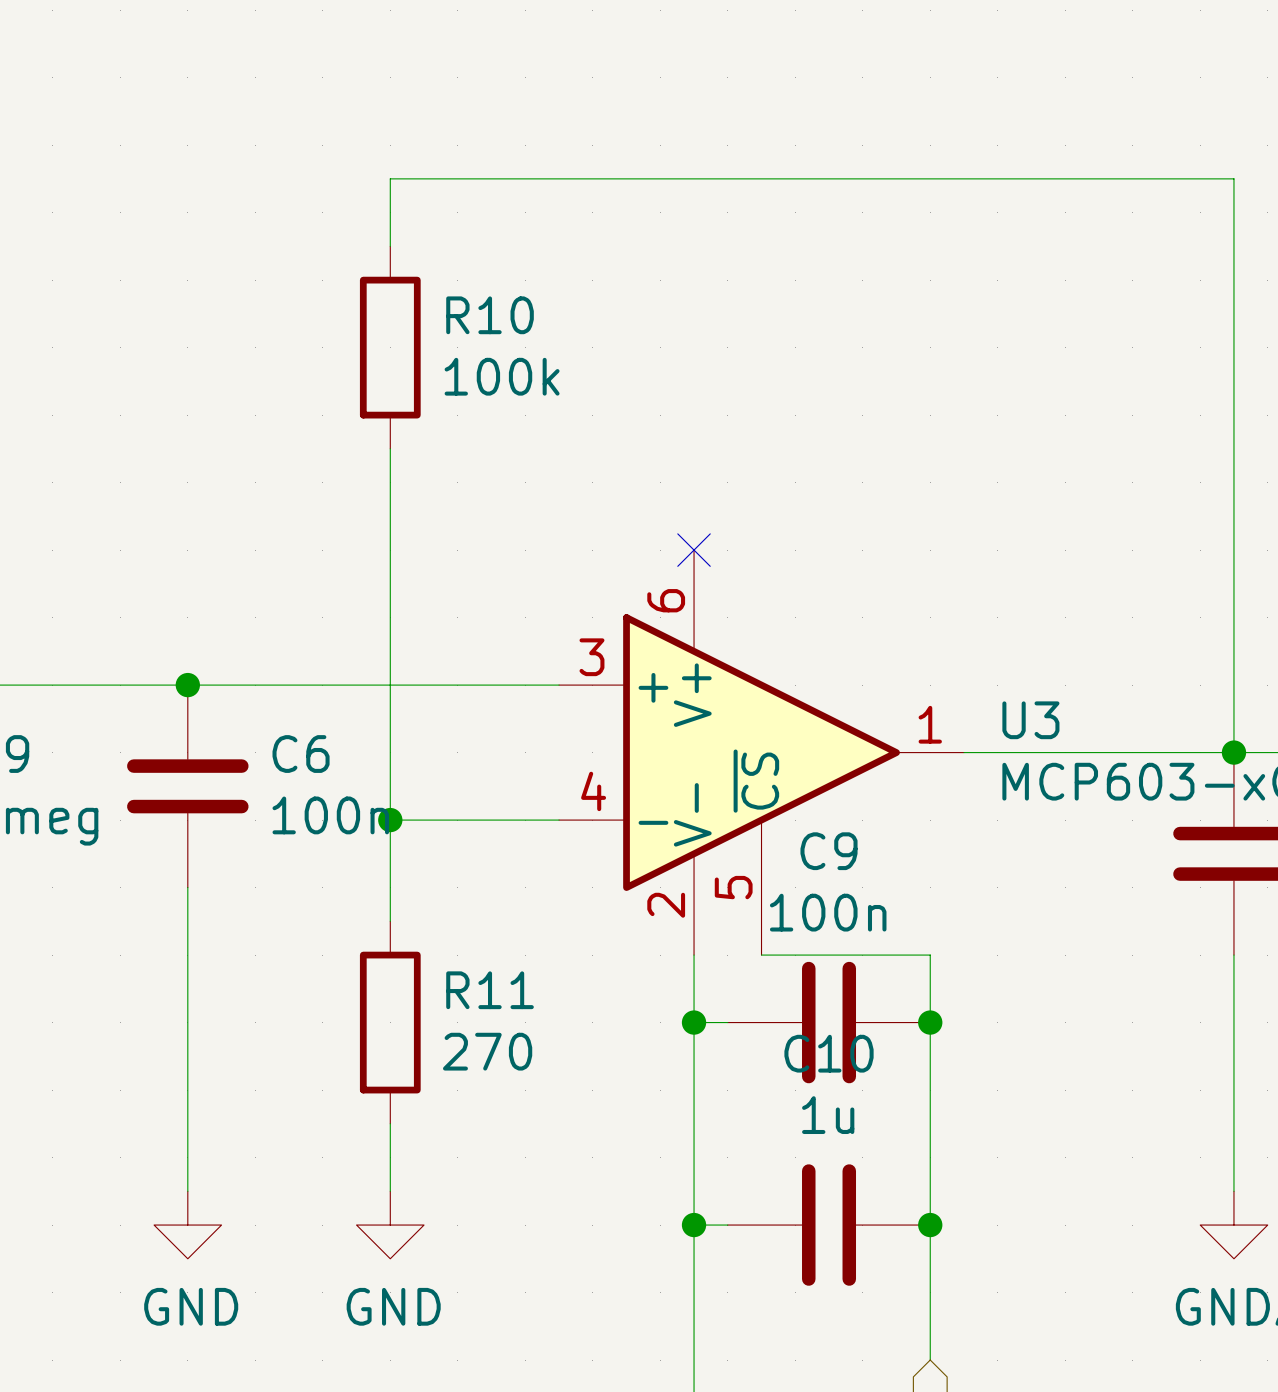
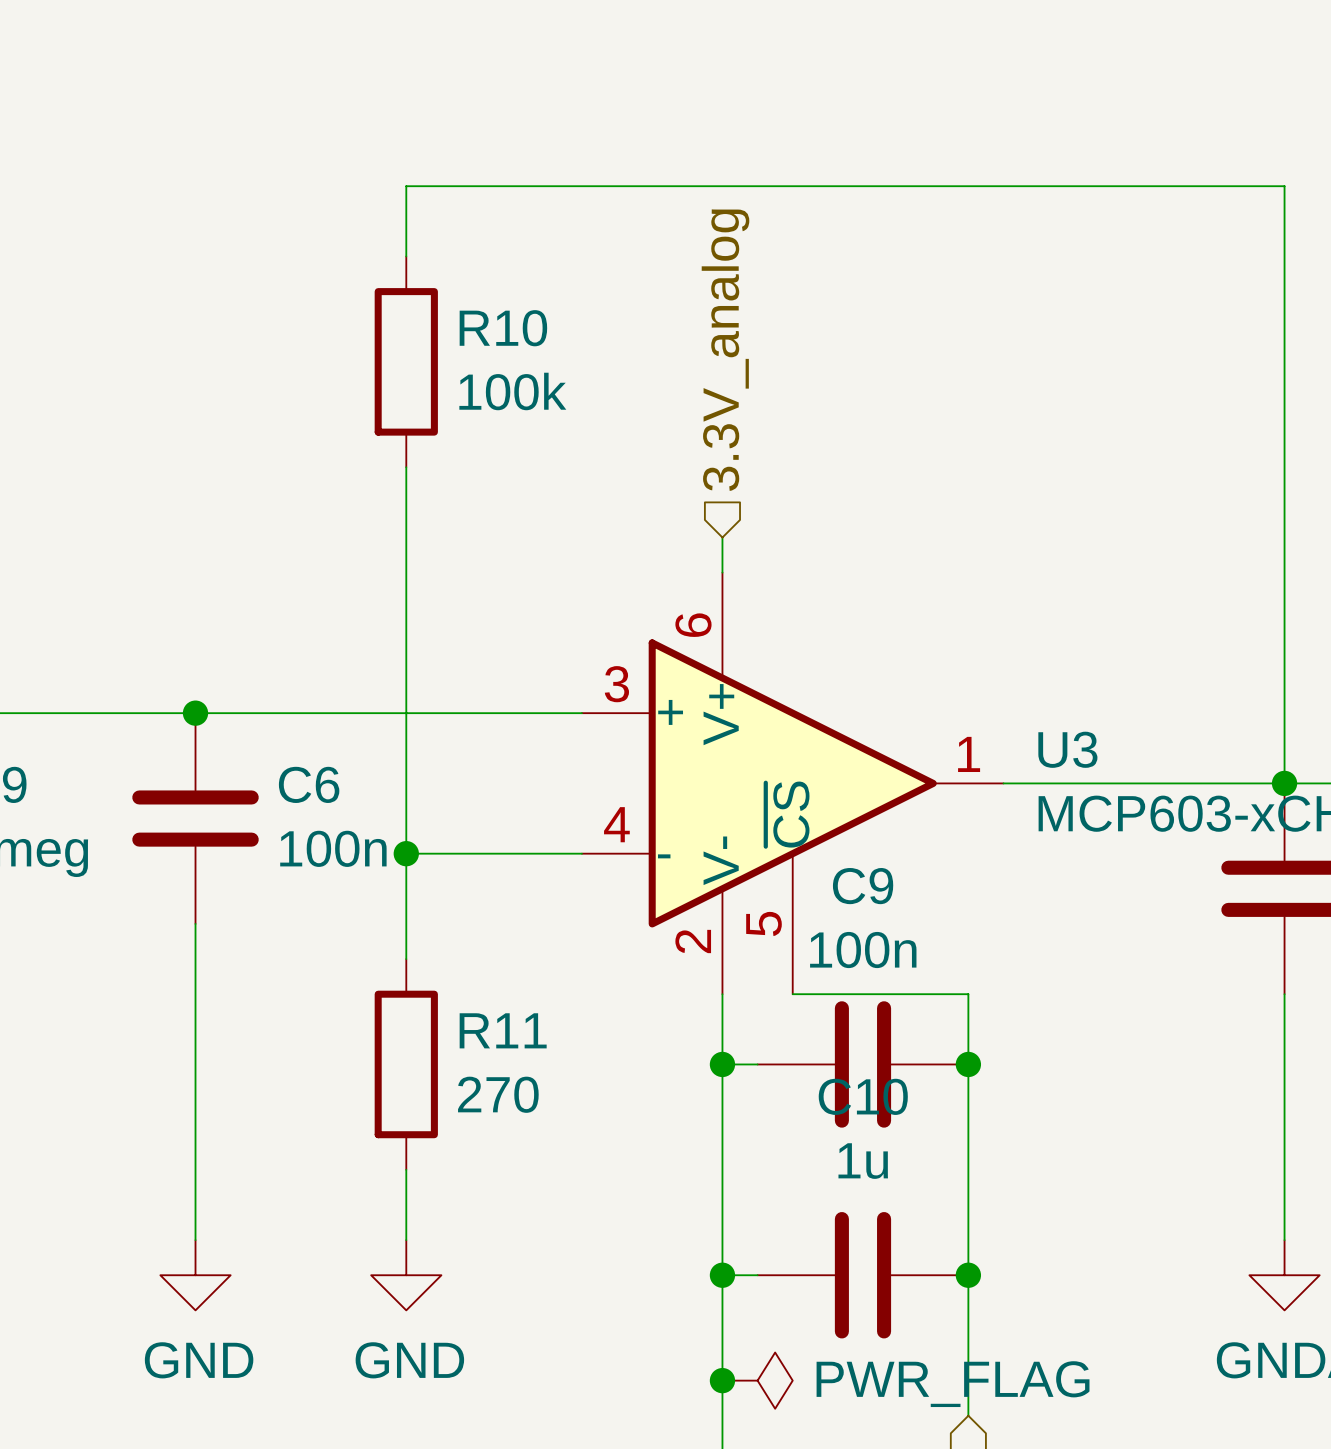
hierarchical label: none -> 3.3V_analog (725, 350)
wire: none -> (722, 537) (722, 572)
no-connect mark: (694, 550) -> none
junction: none -> (722, 1380)
power symbol: none -> PWR_FLAG (757, 1380)

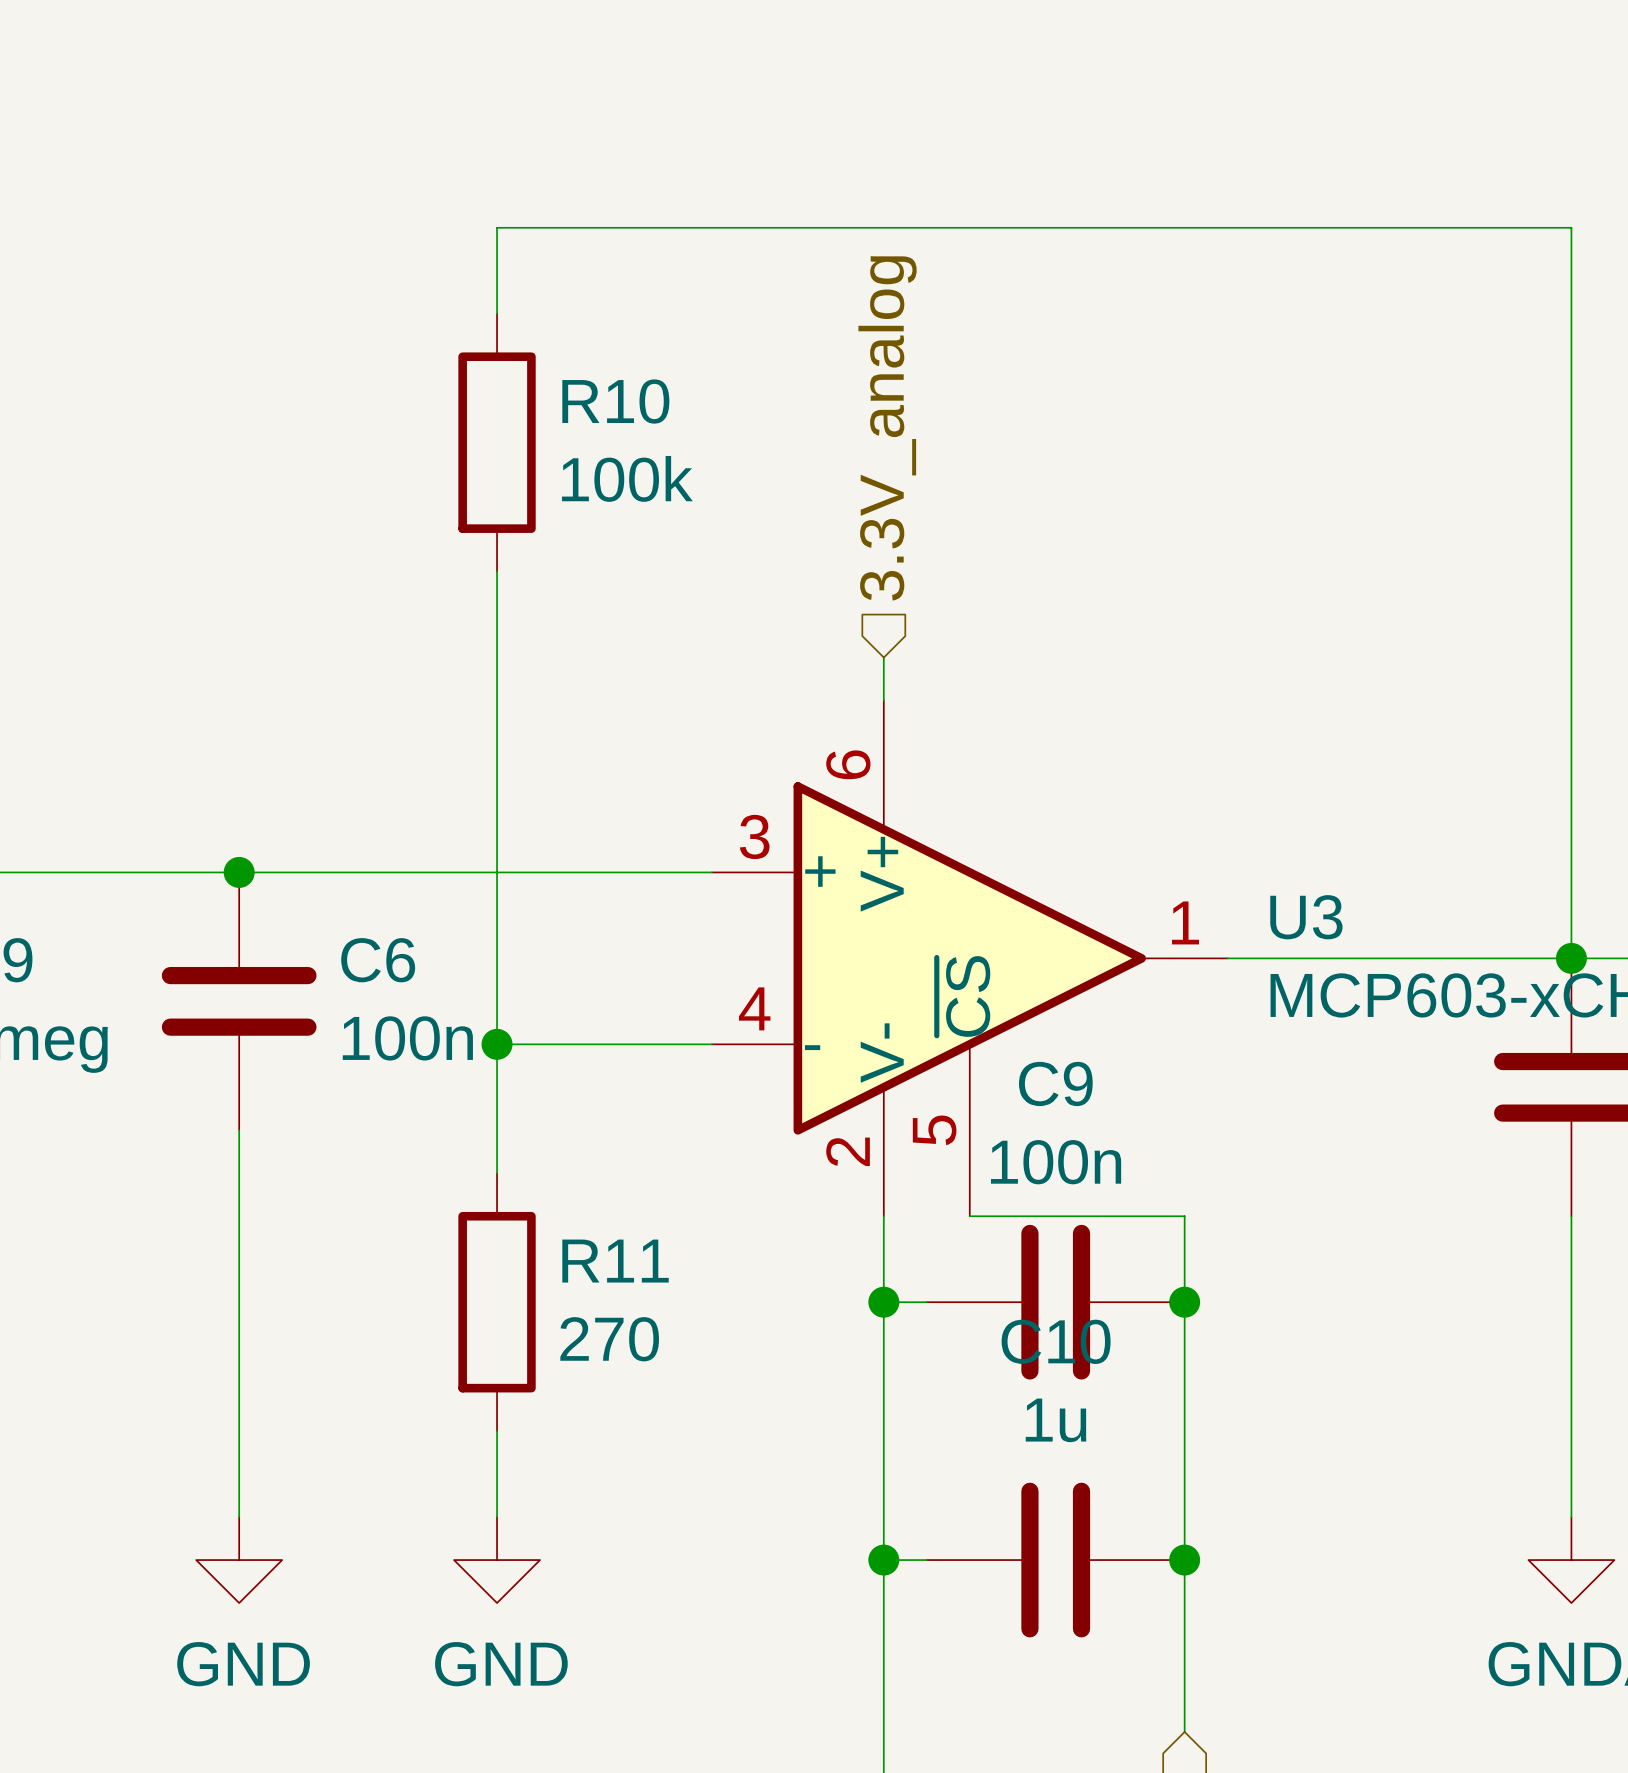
junction: (722, 1380) -> none
power symbol: PWR_FLAG (757, 1380) -> none

